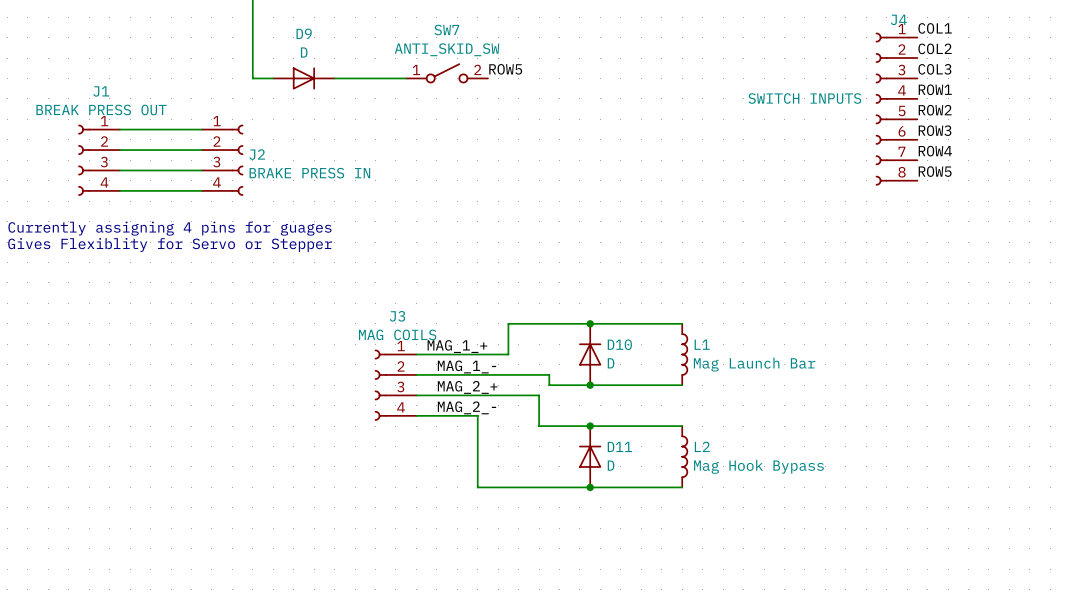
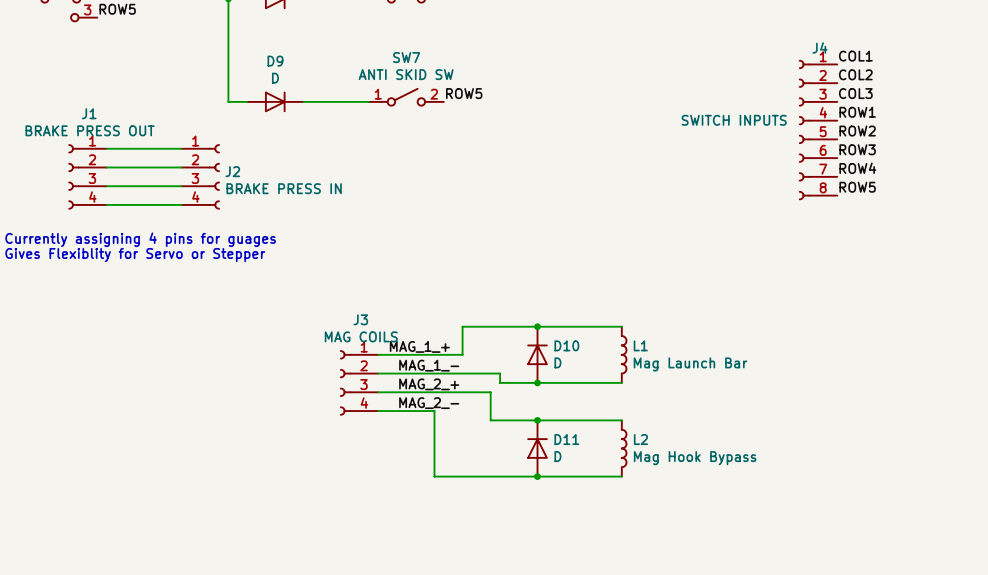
SW7 value: ANTI_SKID_SW (447, 49) -> ANTI SKID SW (406, 74)
J1 value: BREAK PRESS OUT (101, 109) -> BRAKE PRESS OUT (90, 130)

